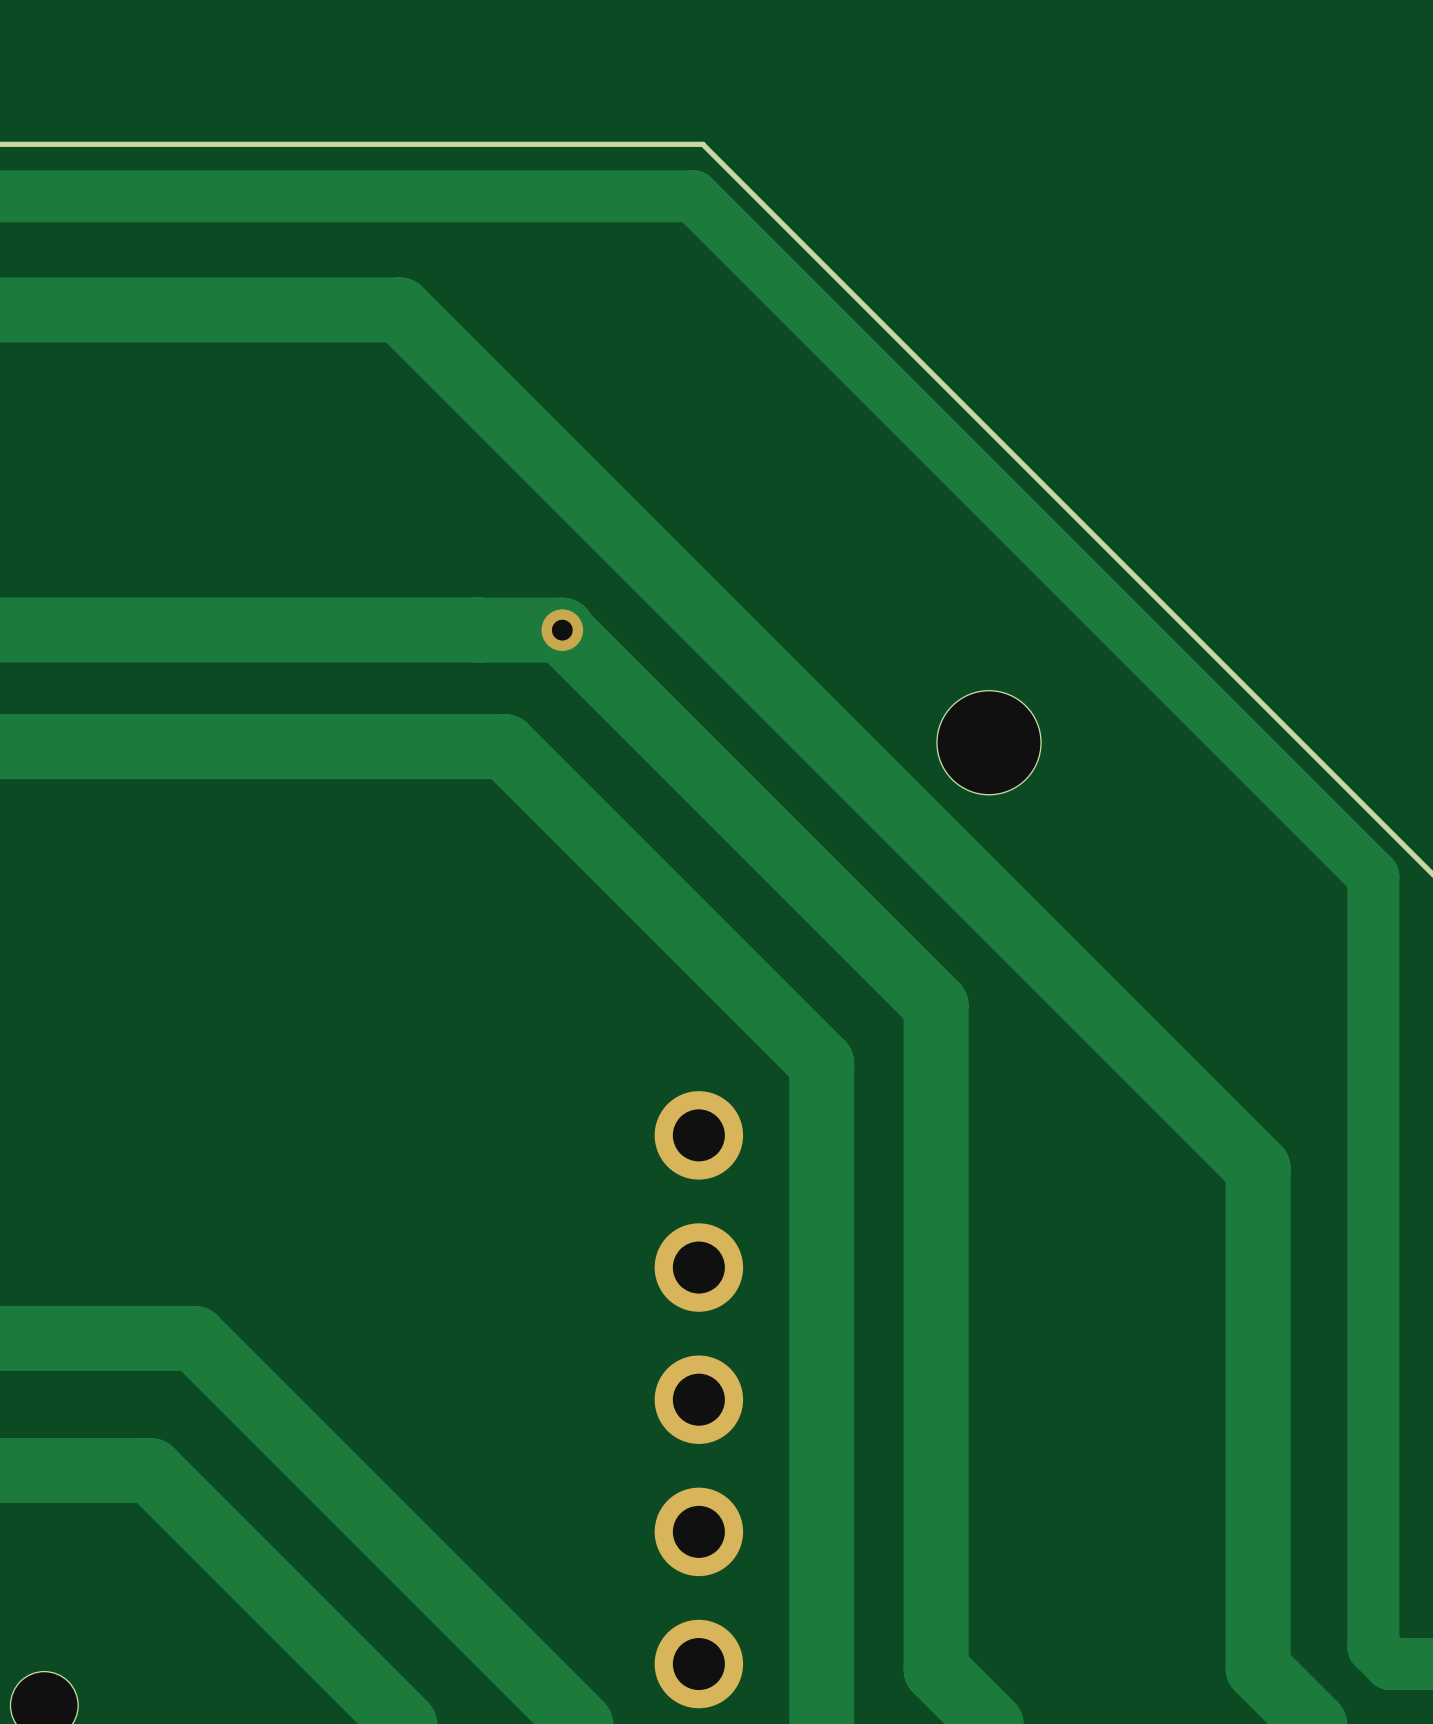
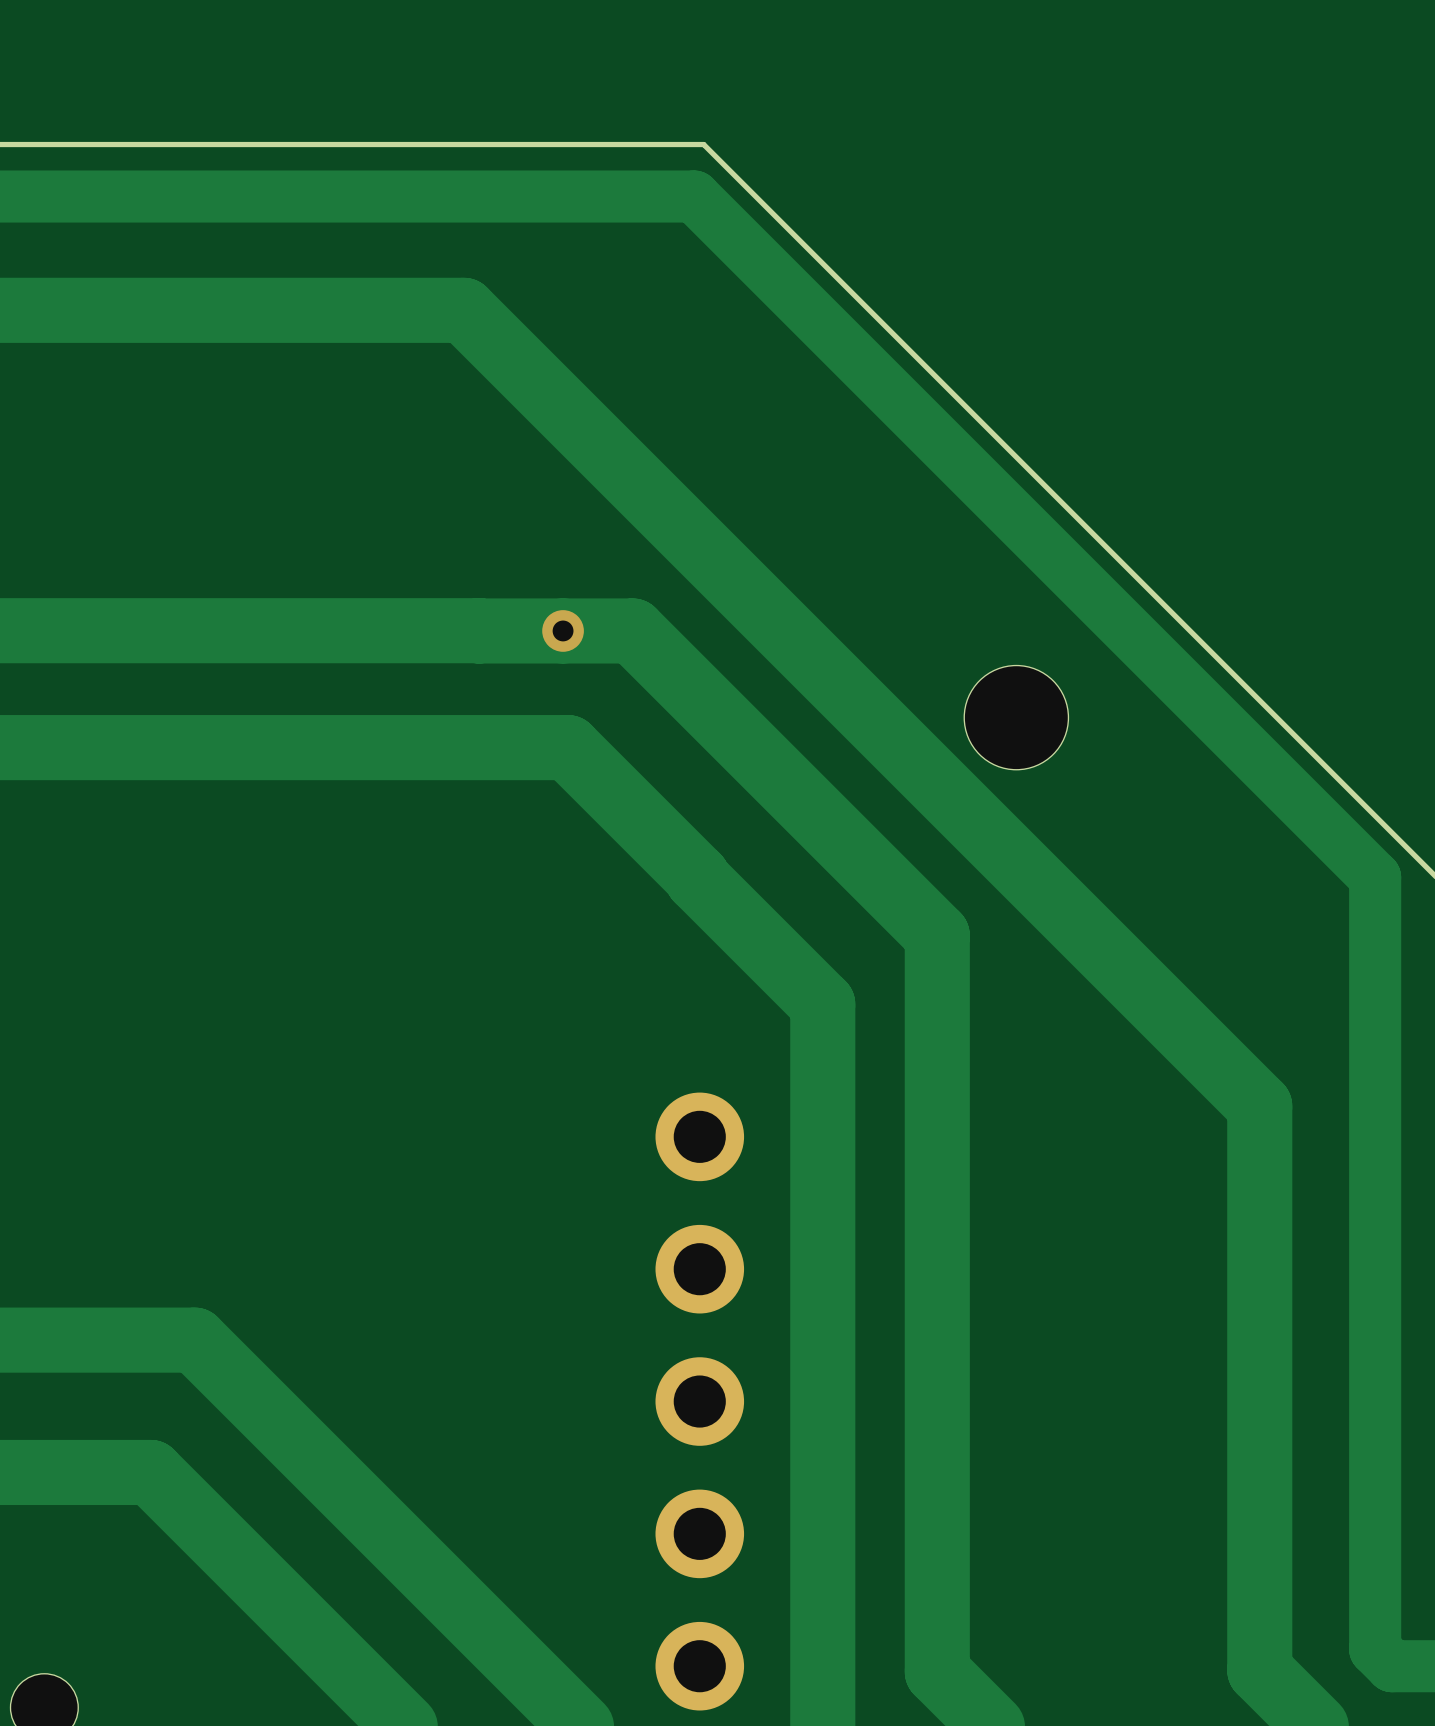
track: (399, 309) (1258, 1168) -> (400, 310) (463, 310) (1259, 1106) (1259, 1169)
track: (562, 630) (936, 1005) -> (563, 630) (632, 630) (937, 935) (937, 1006)
part position: (988, 742) -> (1016, 717)
track: (504, 746) (821, 1063) -> (505, 747) (567, 747) (822, 1004) (822, 1064)

